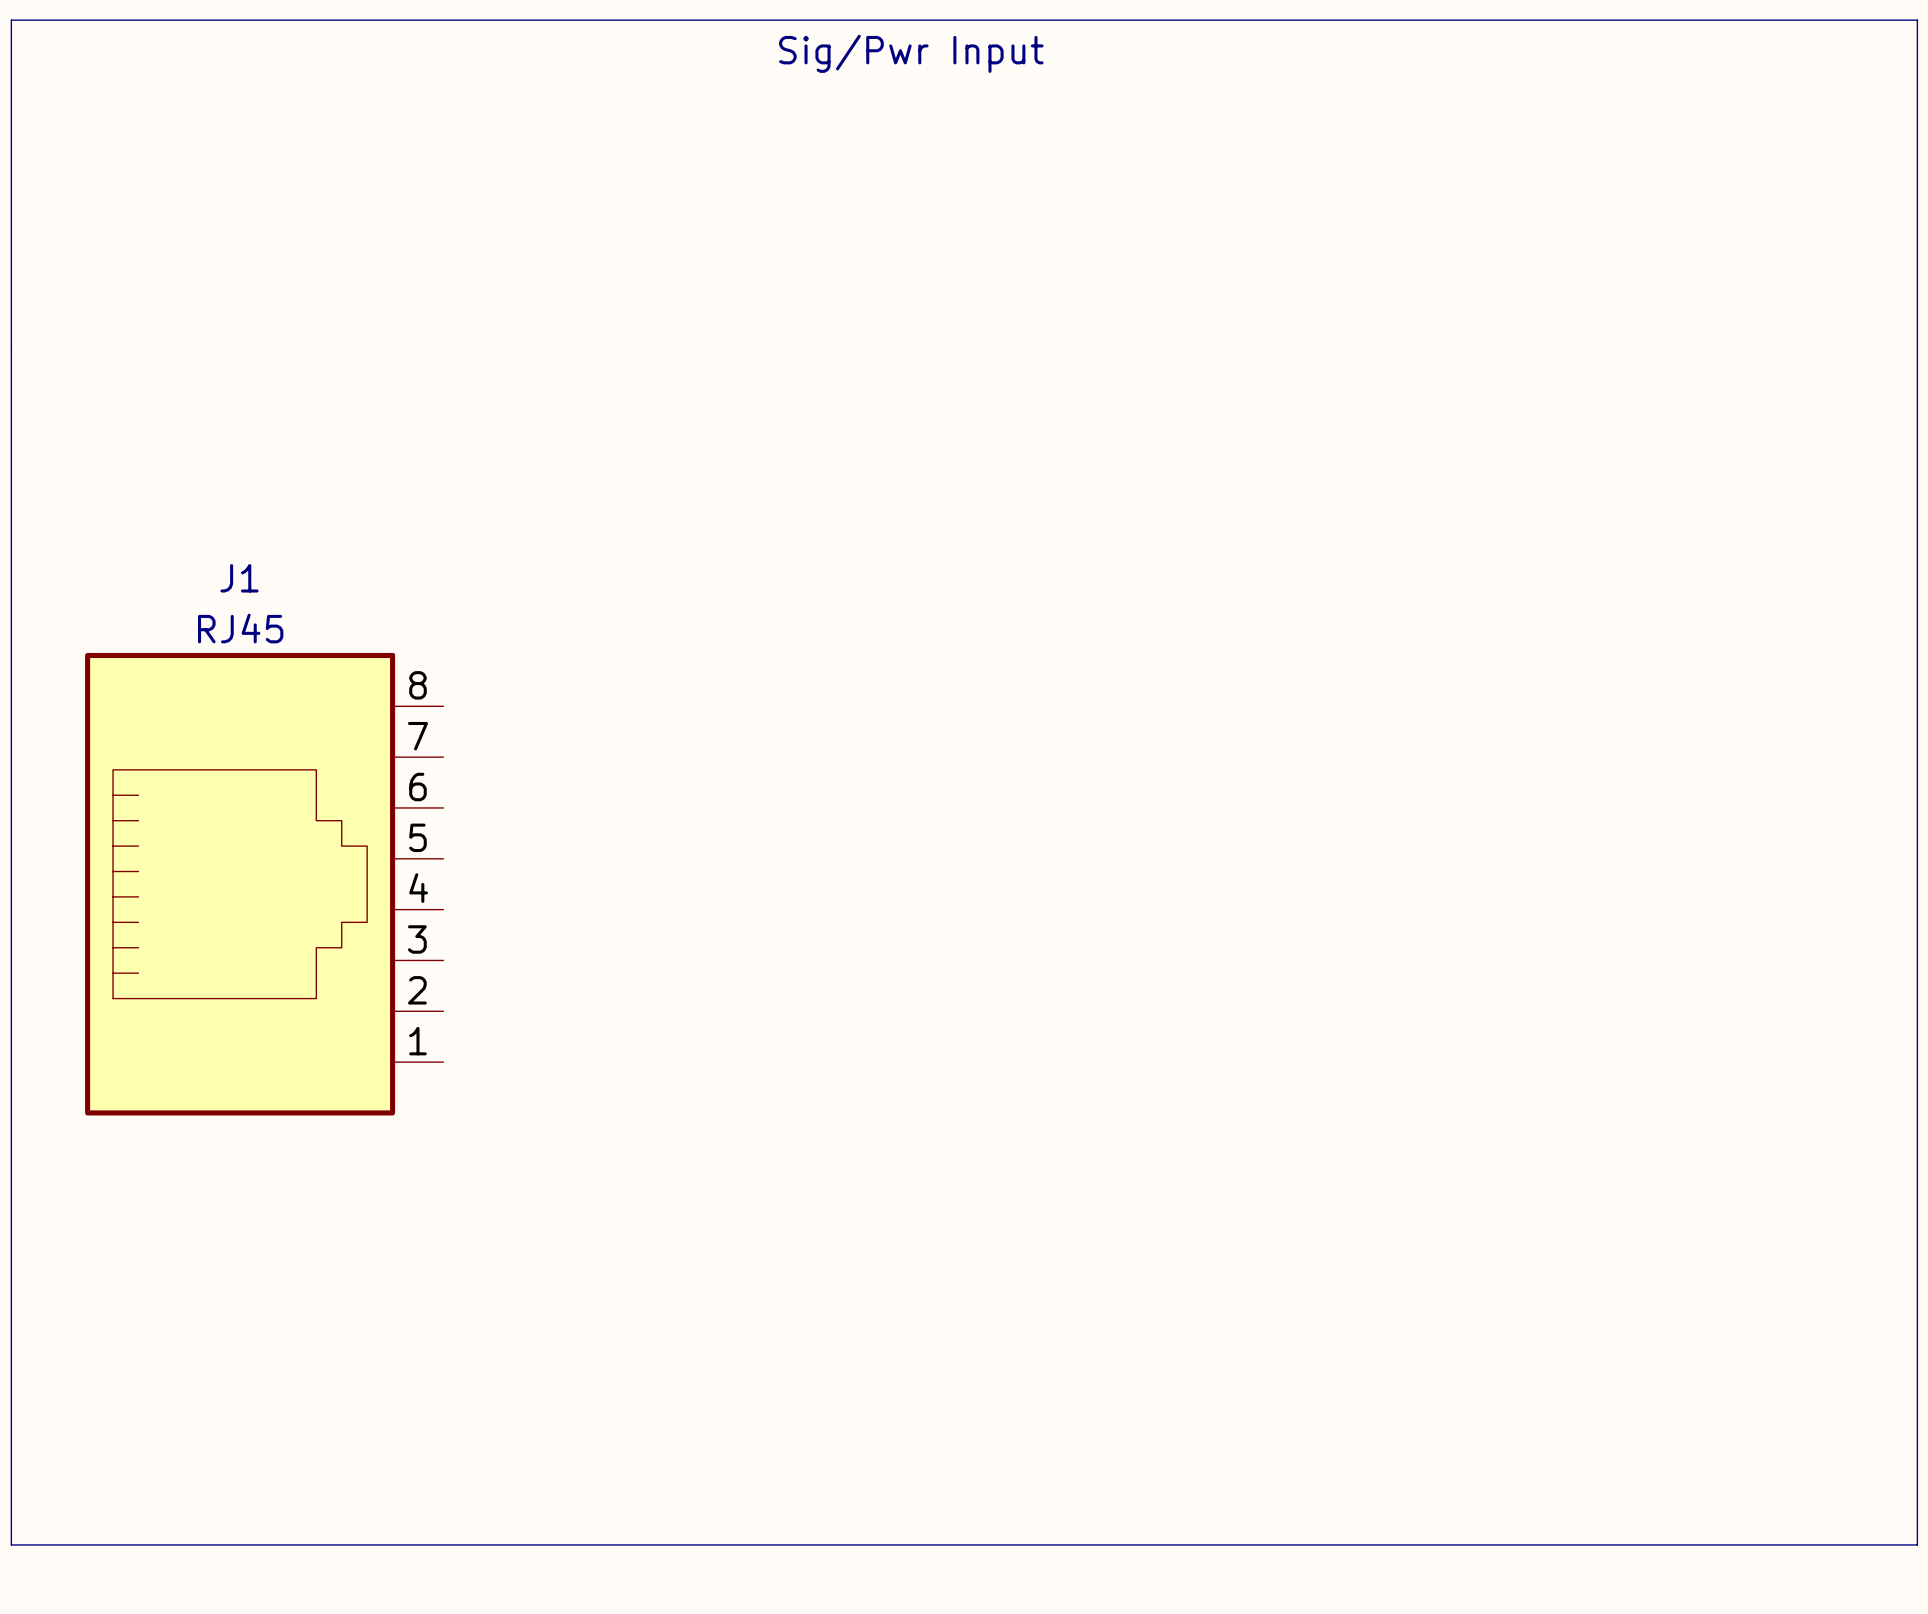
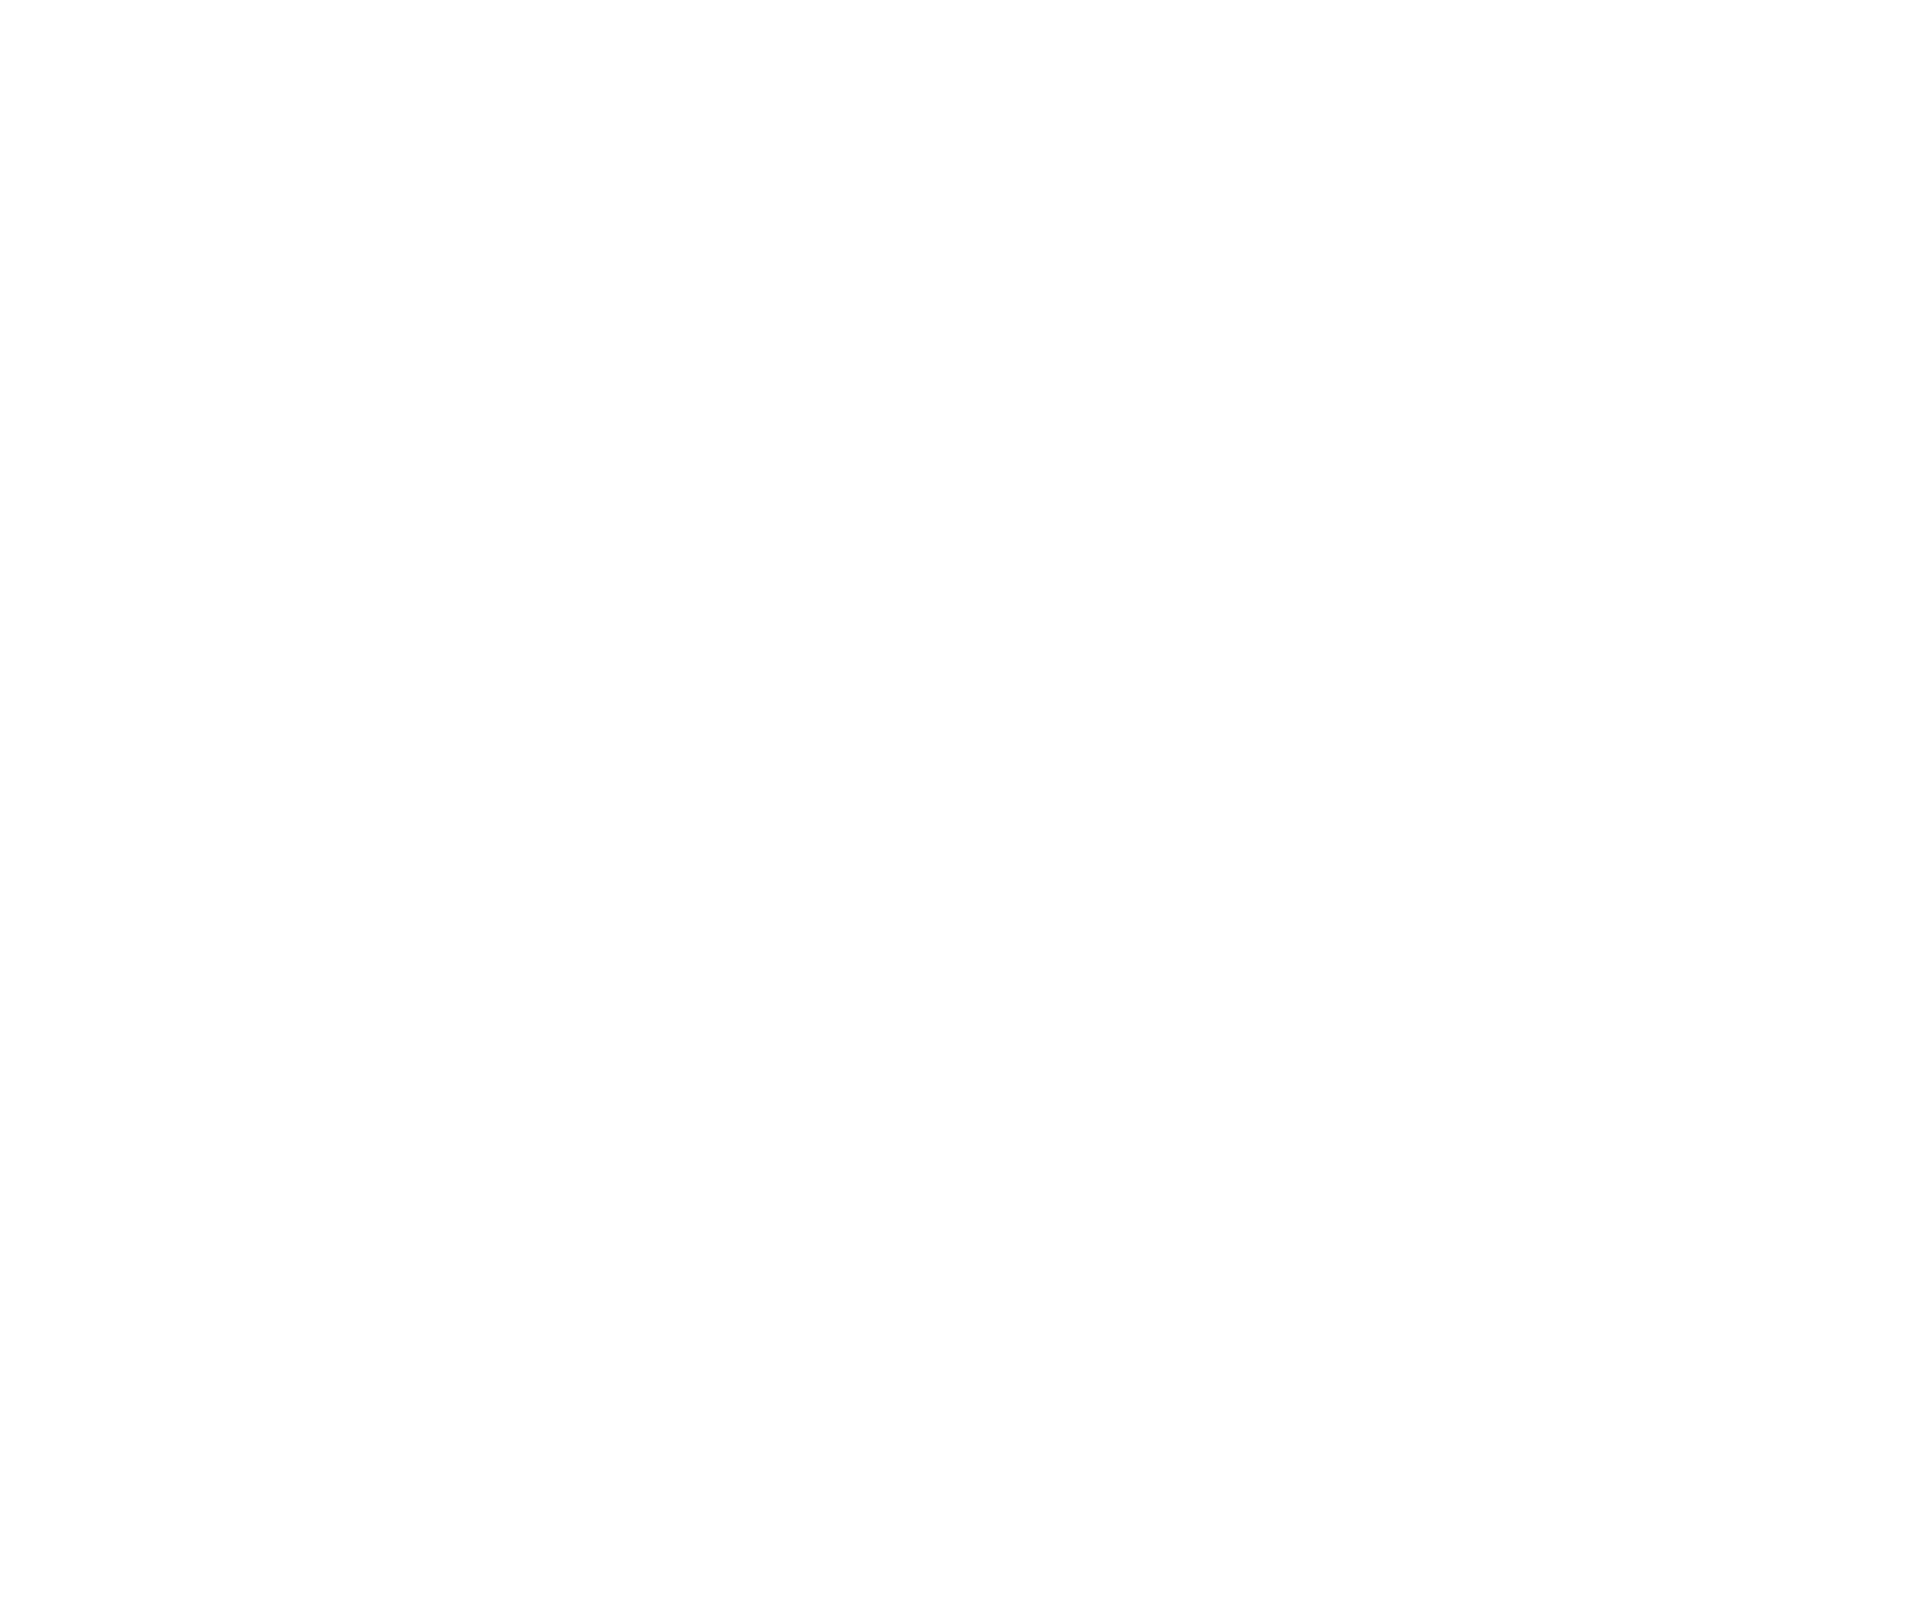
line: (11, 20) (11, 1544) (1917, 1544) (1917, 20) (11, 20) -> none
text: Sig/Pwr Input (911, 53) -> none
J1: RJ45 (264, 884) -> none

